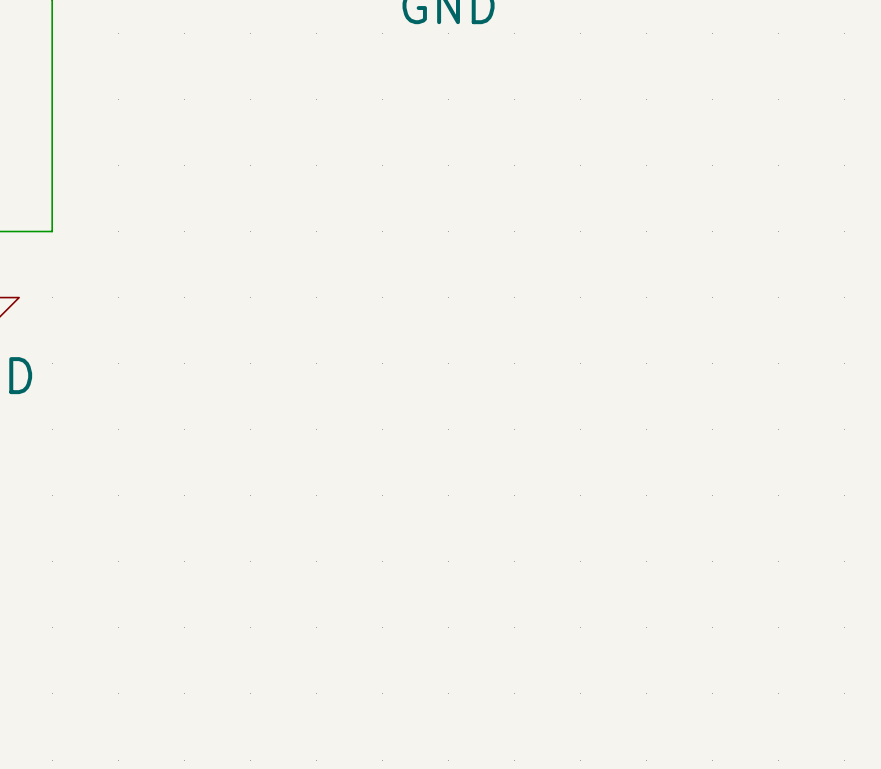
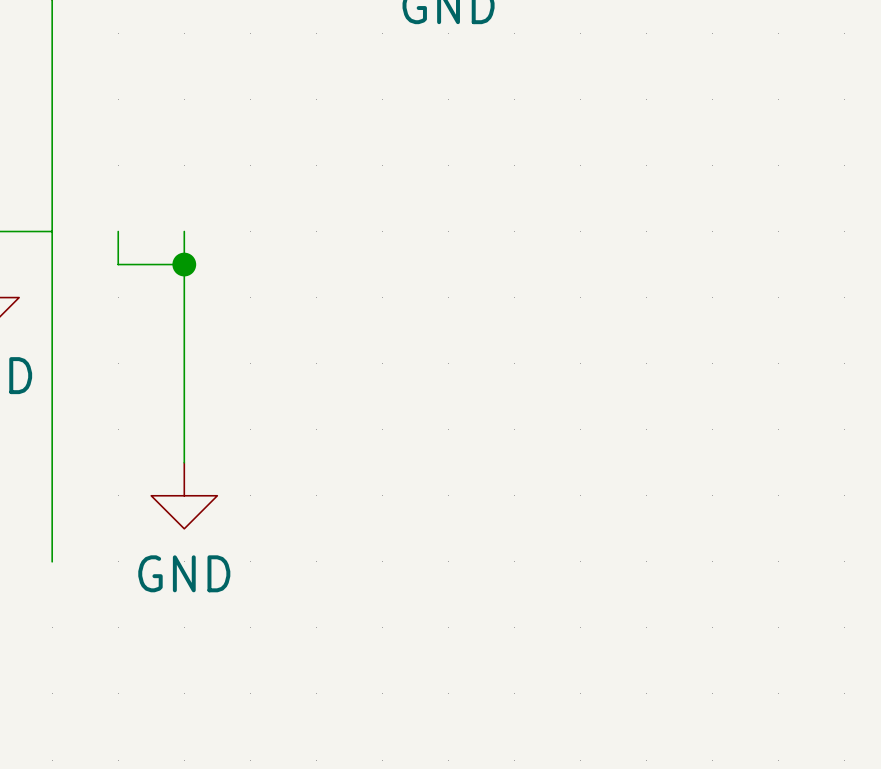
wire: none -> (52, 231) (52, 561)
wire: none -> (118, 231) (118, 264) (184, 264)
wire: none -> (184, 231) (184, 462)
junction: none -> (184, 264)
power symbol: none -> GND (184, 495)

